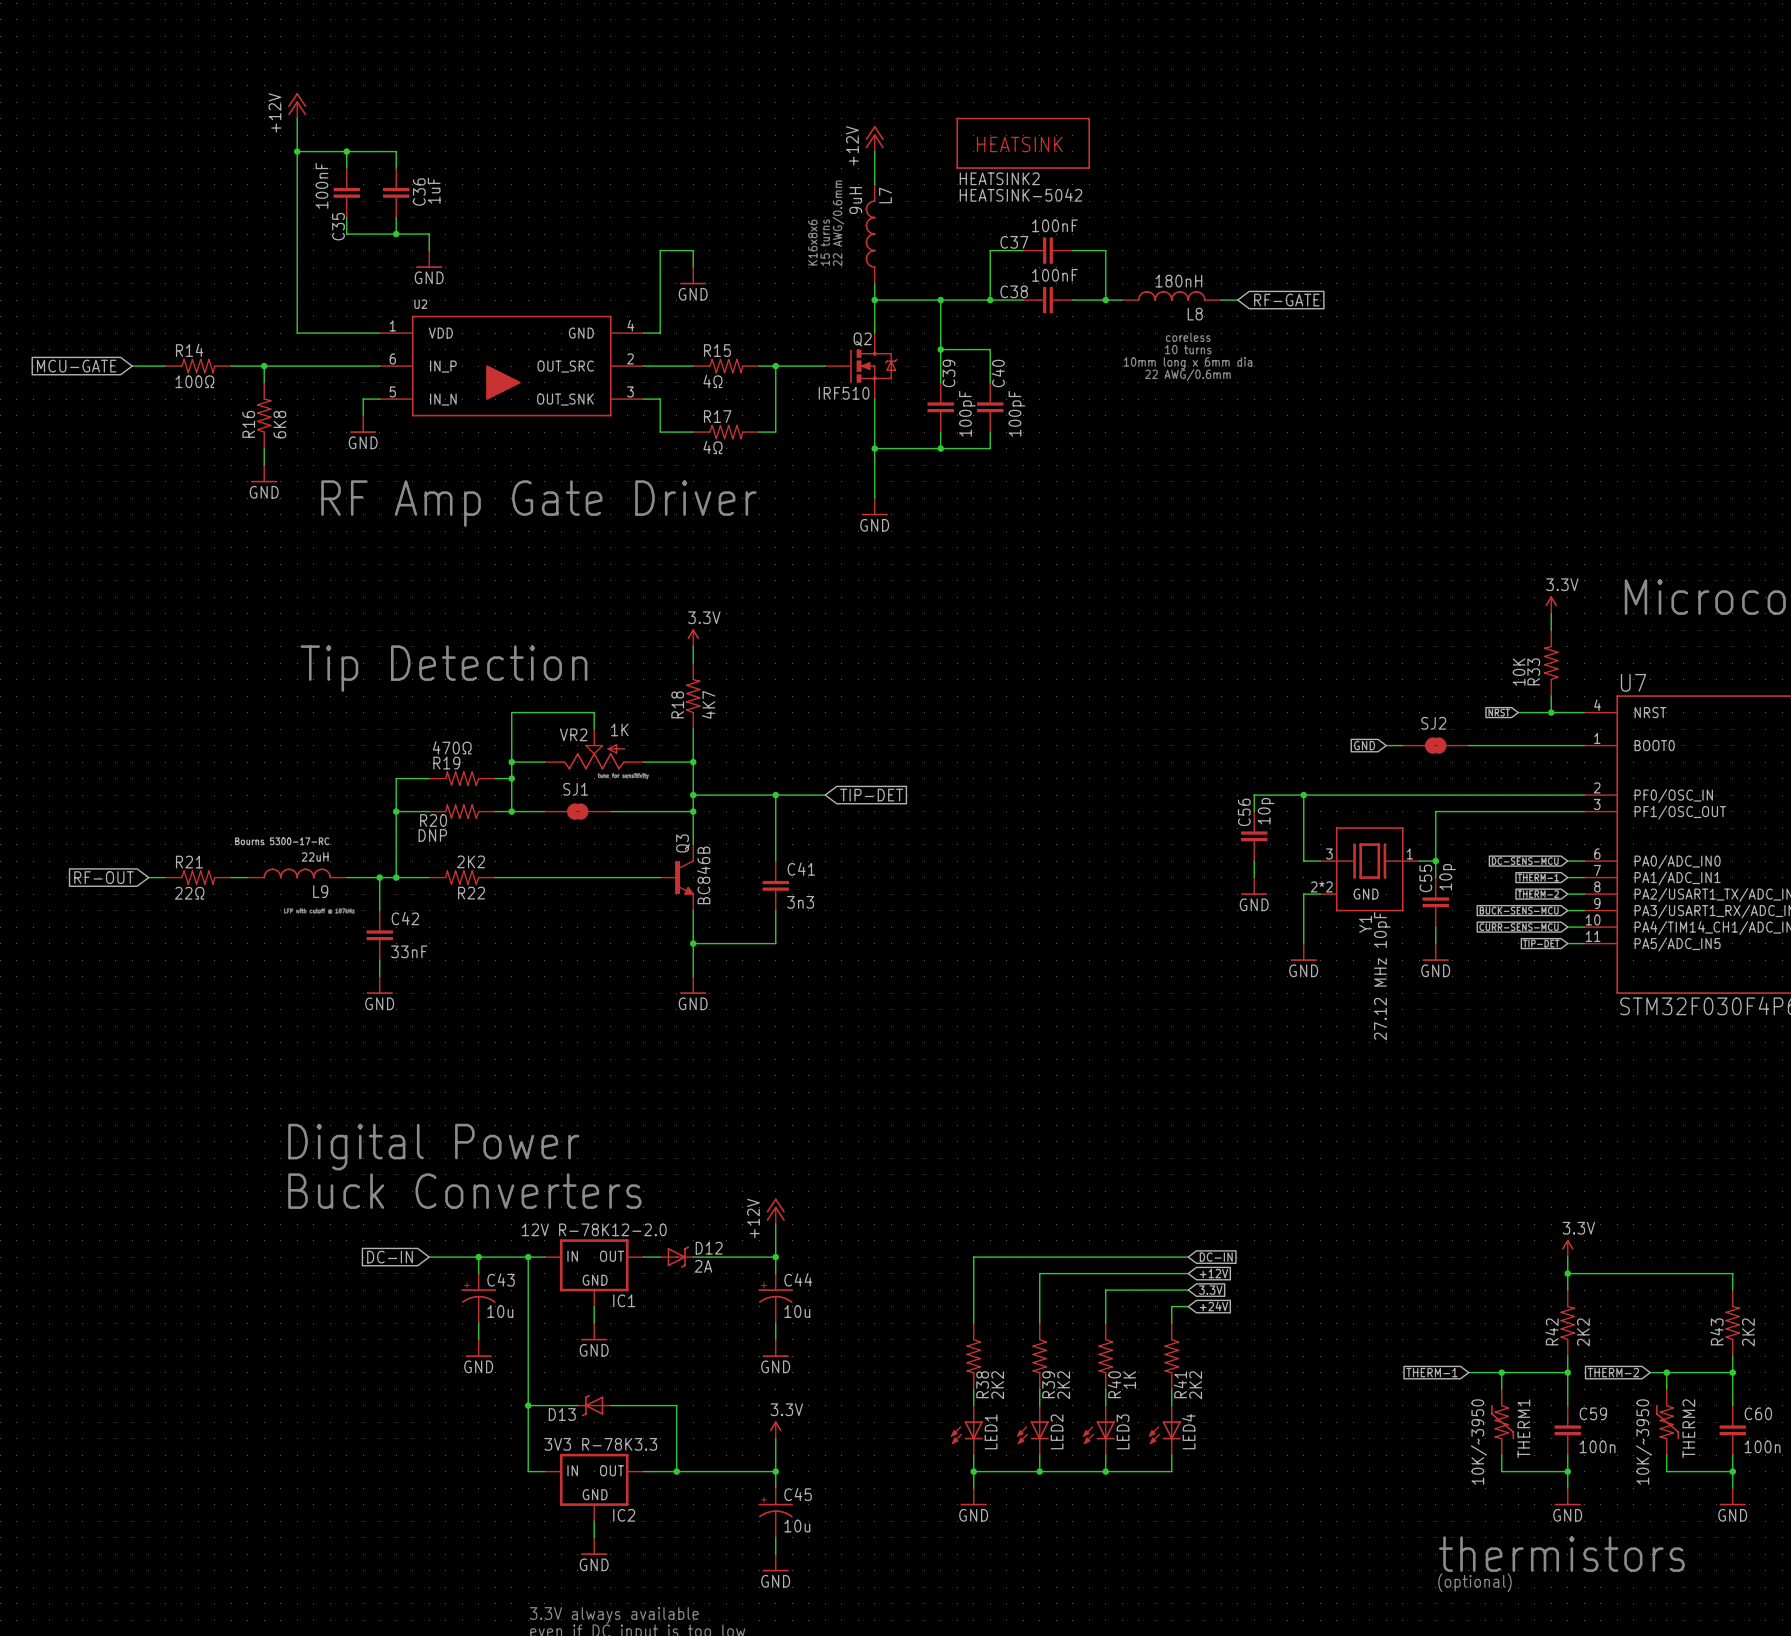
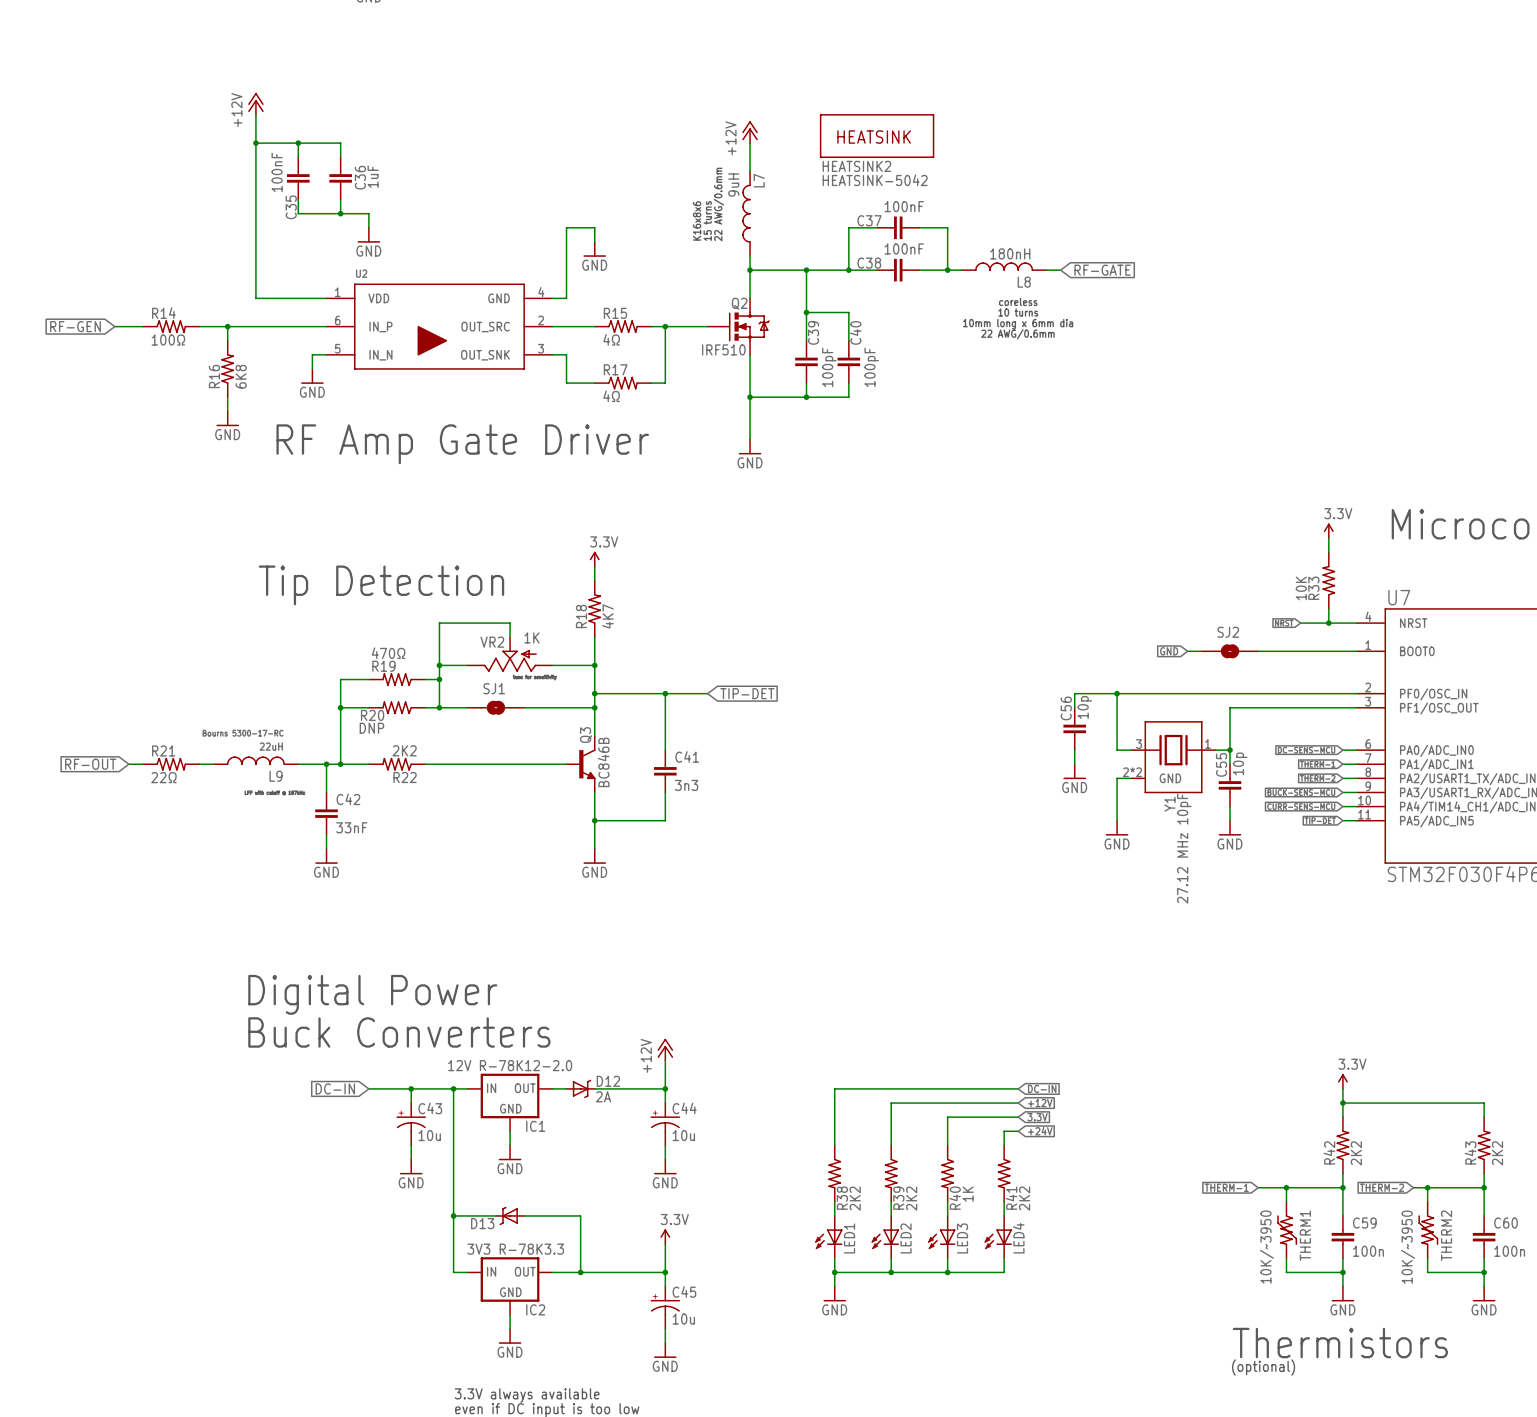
global label: MCU-GATE (76, 366) -> RF-GEN (75, 326)
text: thermistors (1561, 1554) -> Thermistors (1340, 1343)

